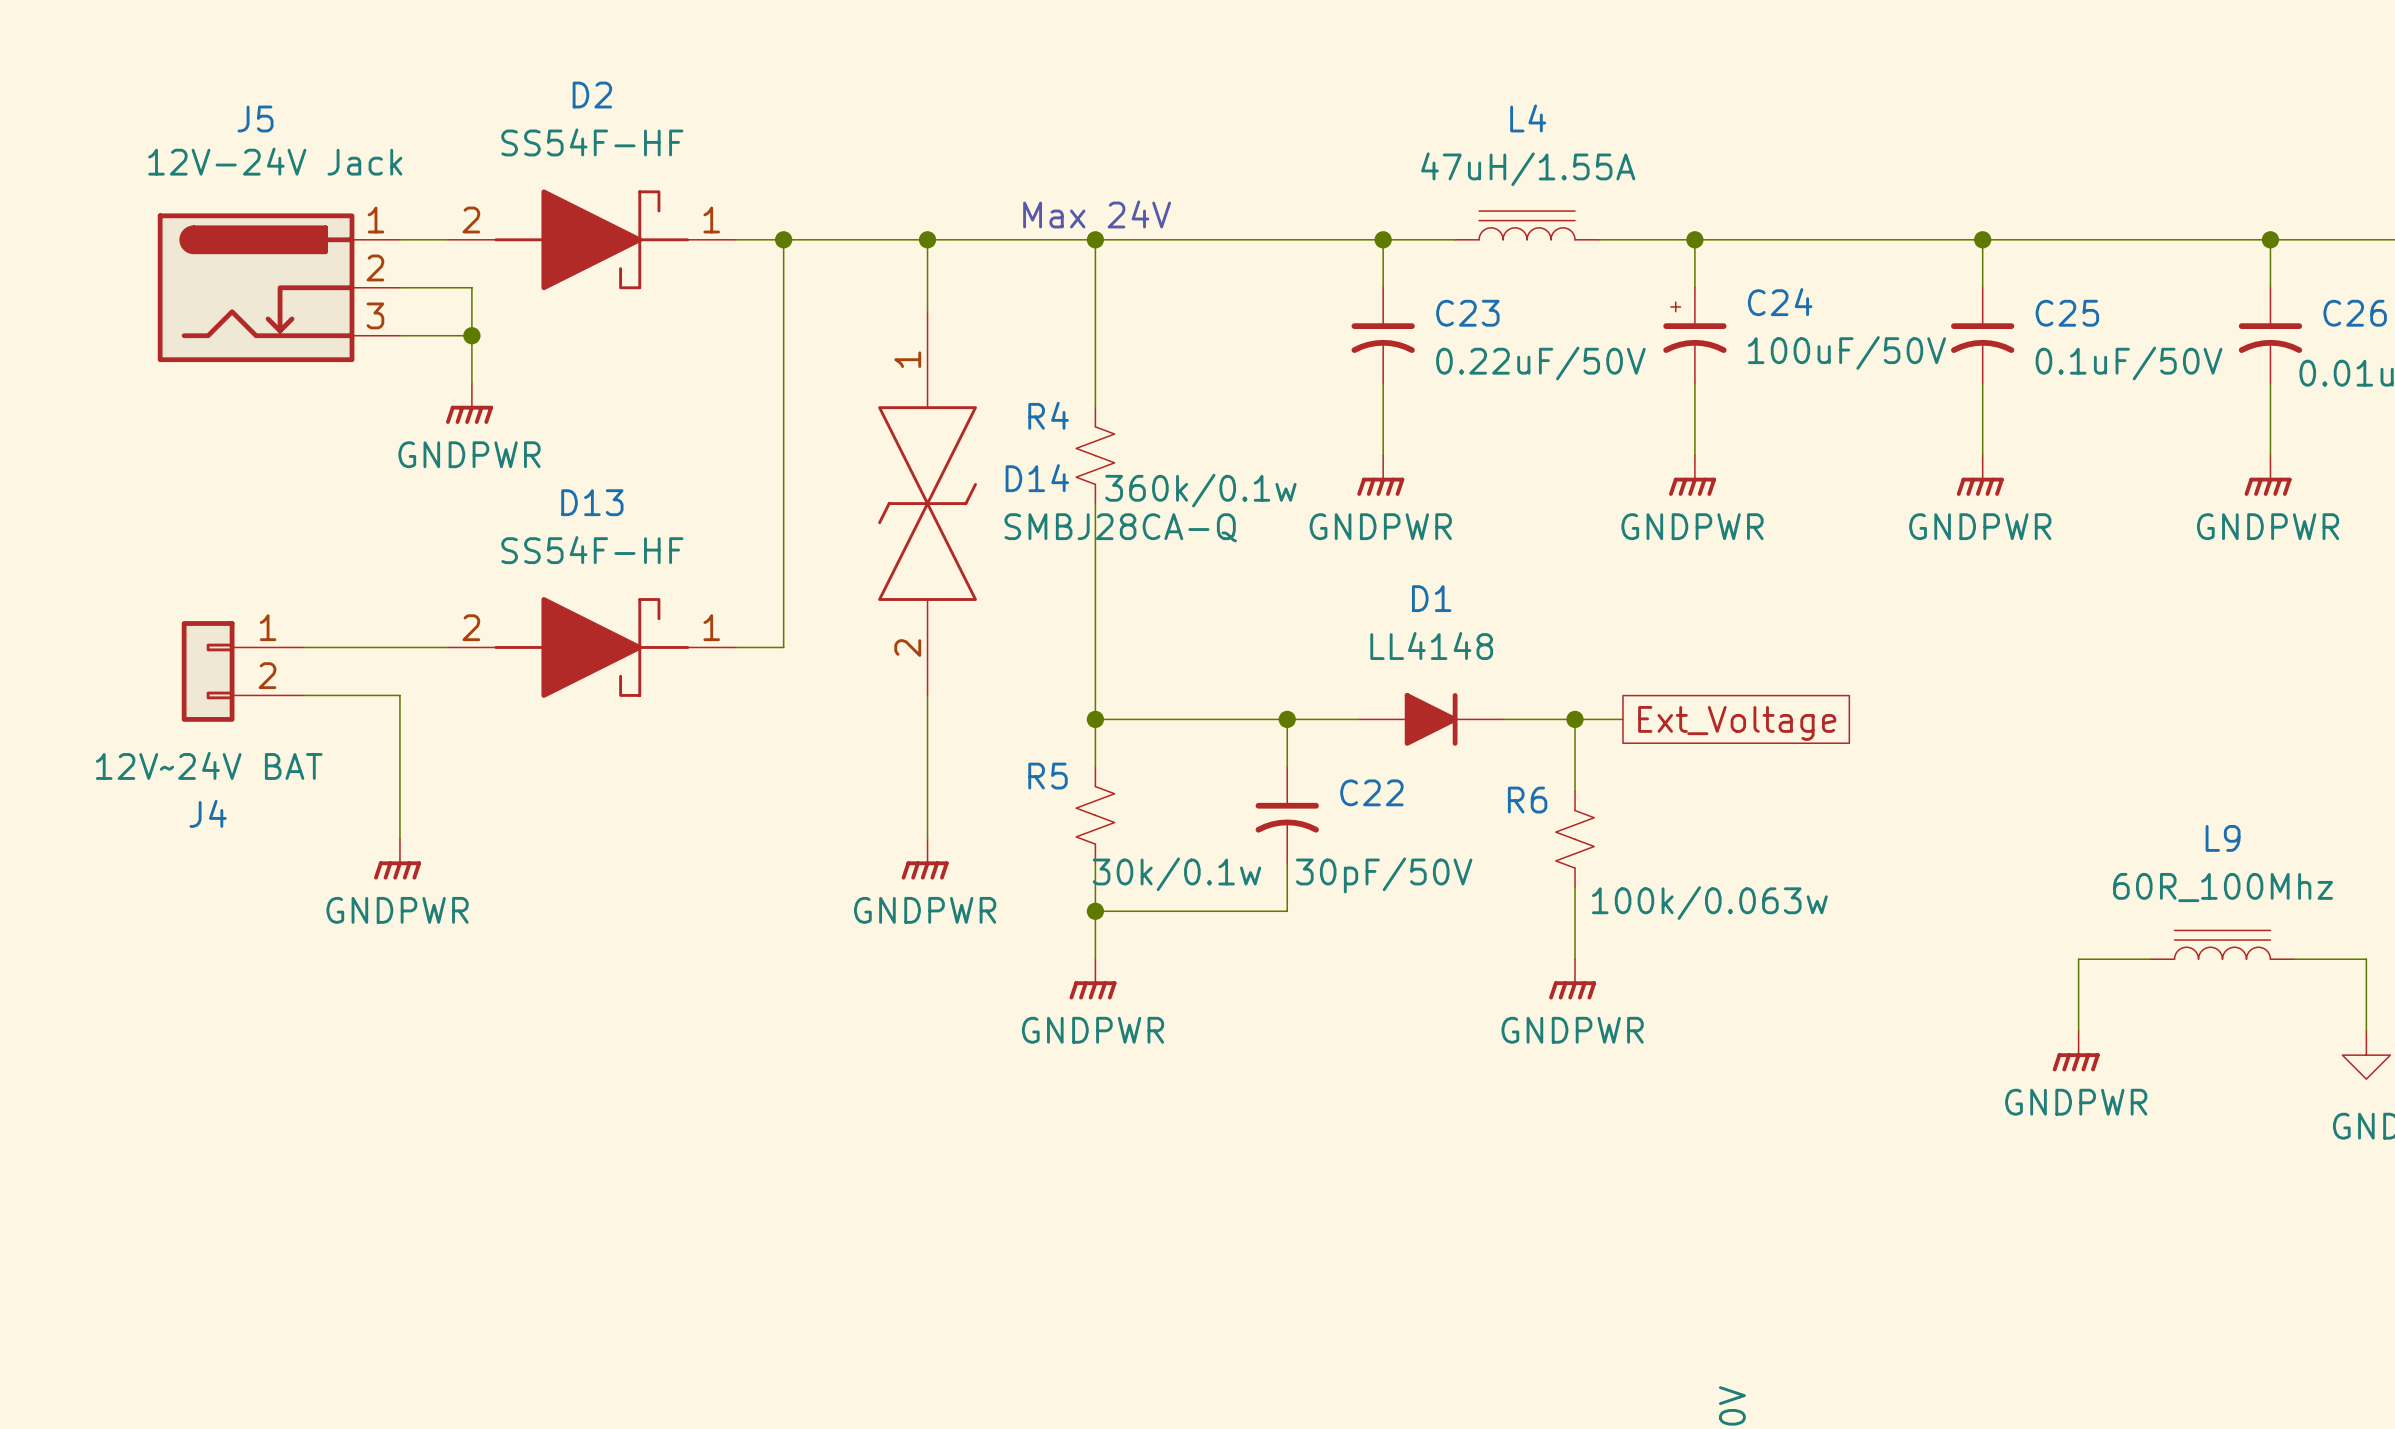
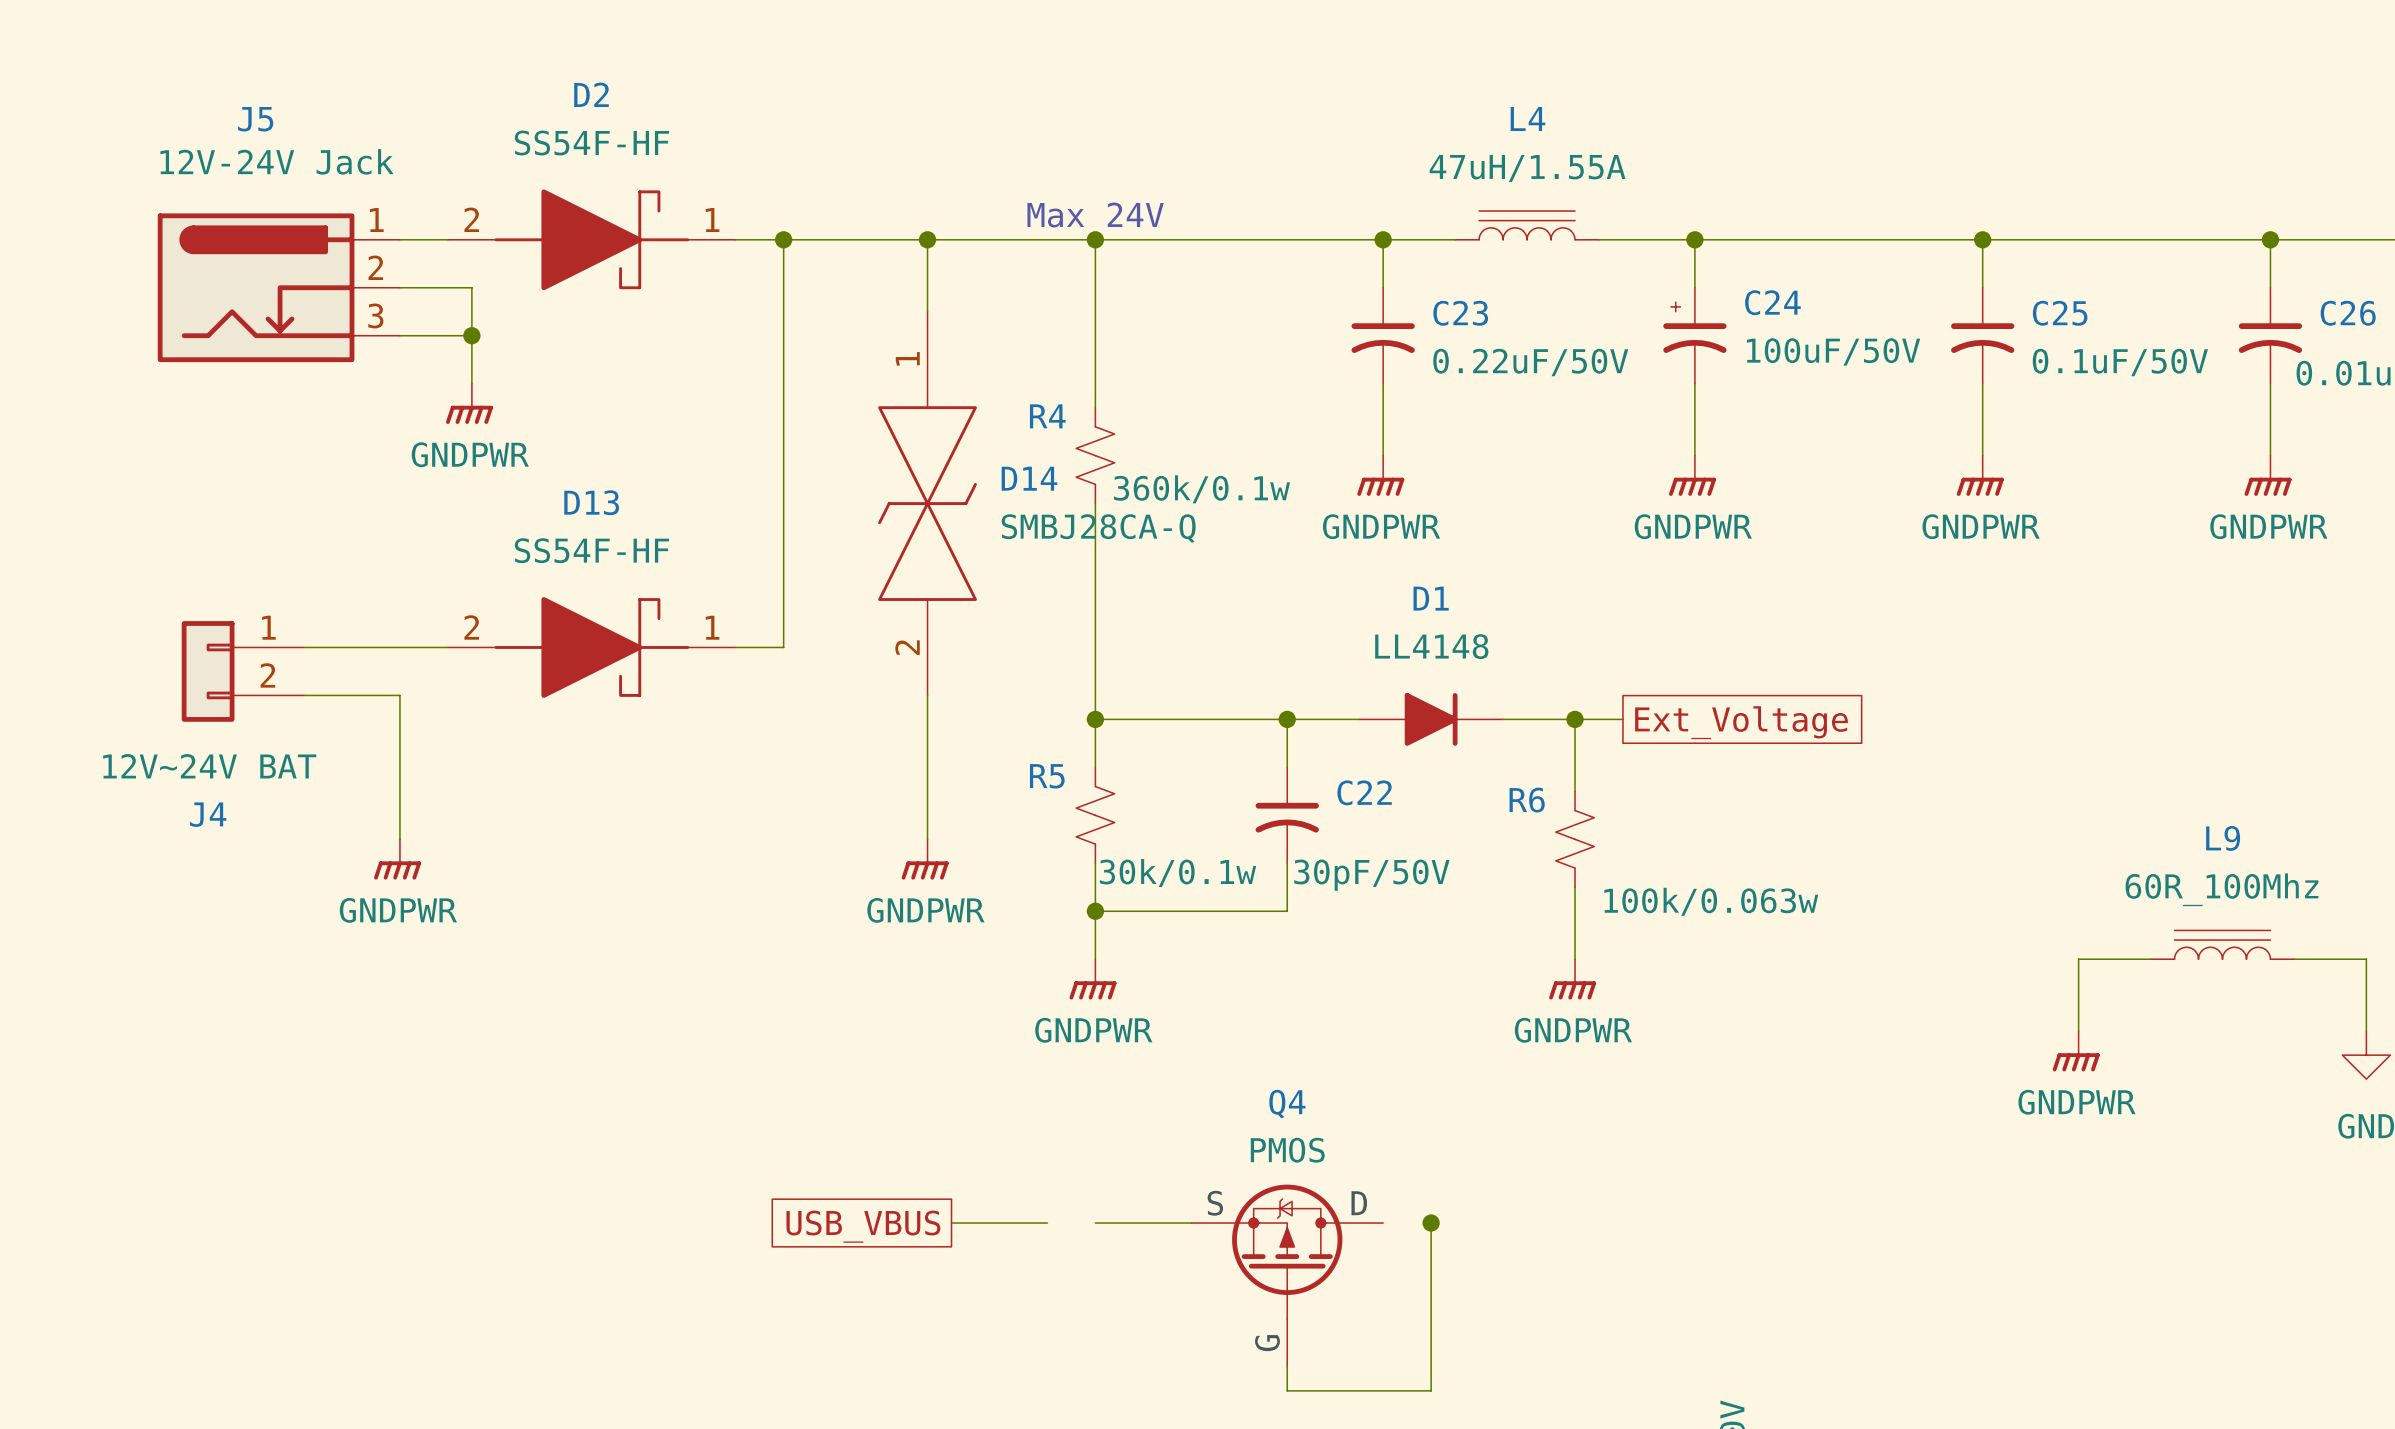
wire: none -> (951, 1223) (1047, 1223)
wire: none -> (1095, 1223) (1191, 1223)
wire: none -> (1431, 1223) (1431, 1390) (1287, 1390) (1287, 1366)
junction: none -> (1431, 1223)
global label: none -> USB_VBUS (863, 1226)
Q4: none -> PMOS (1287, 1275)

